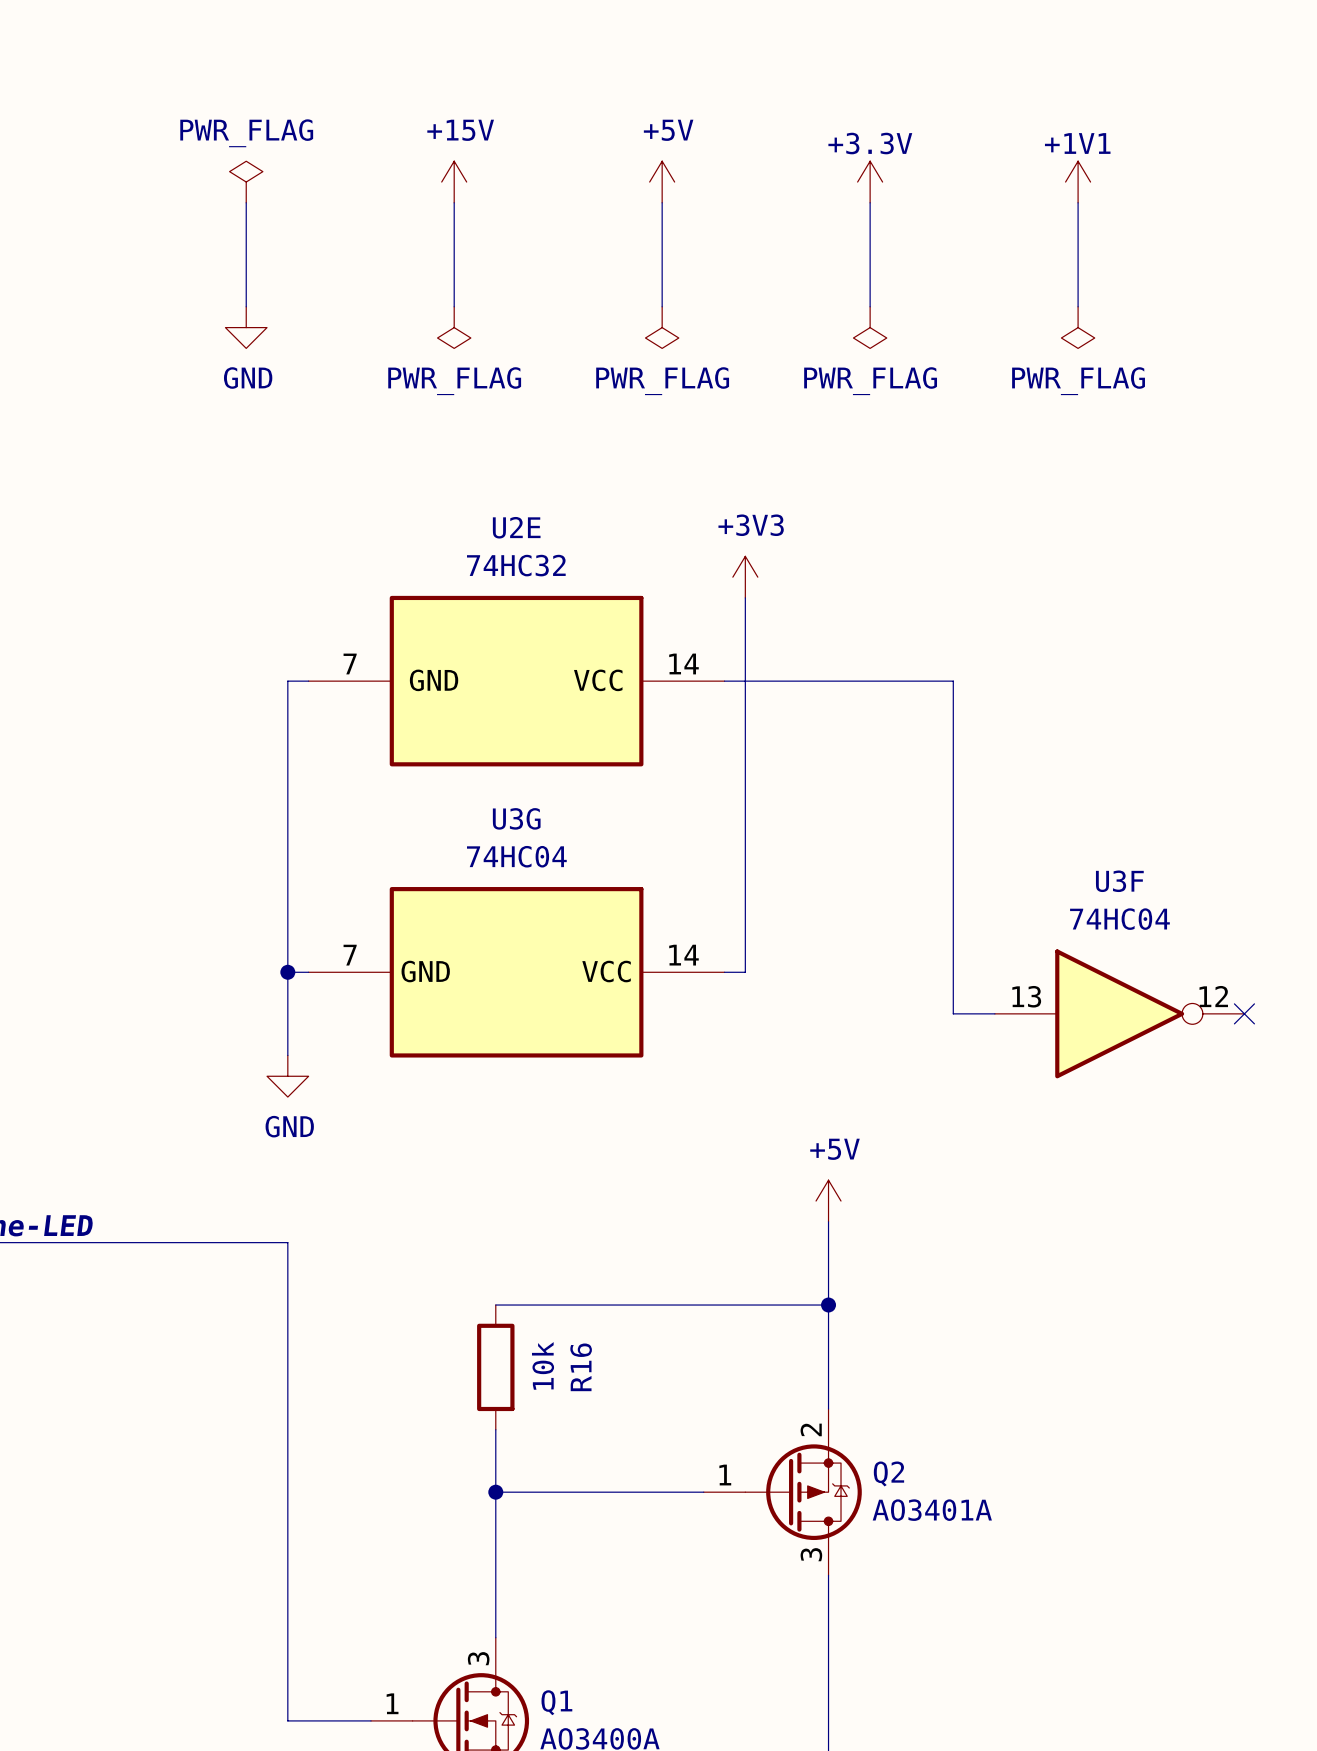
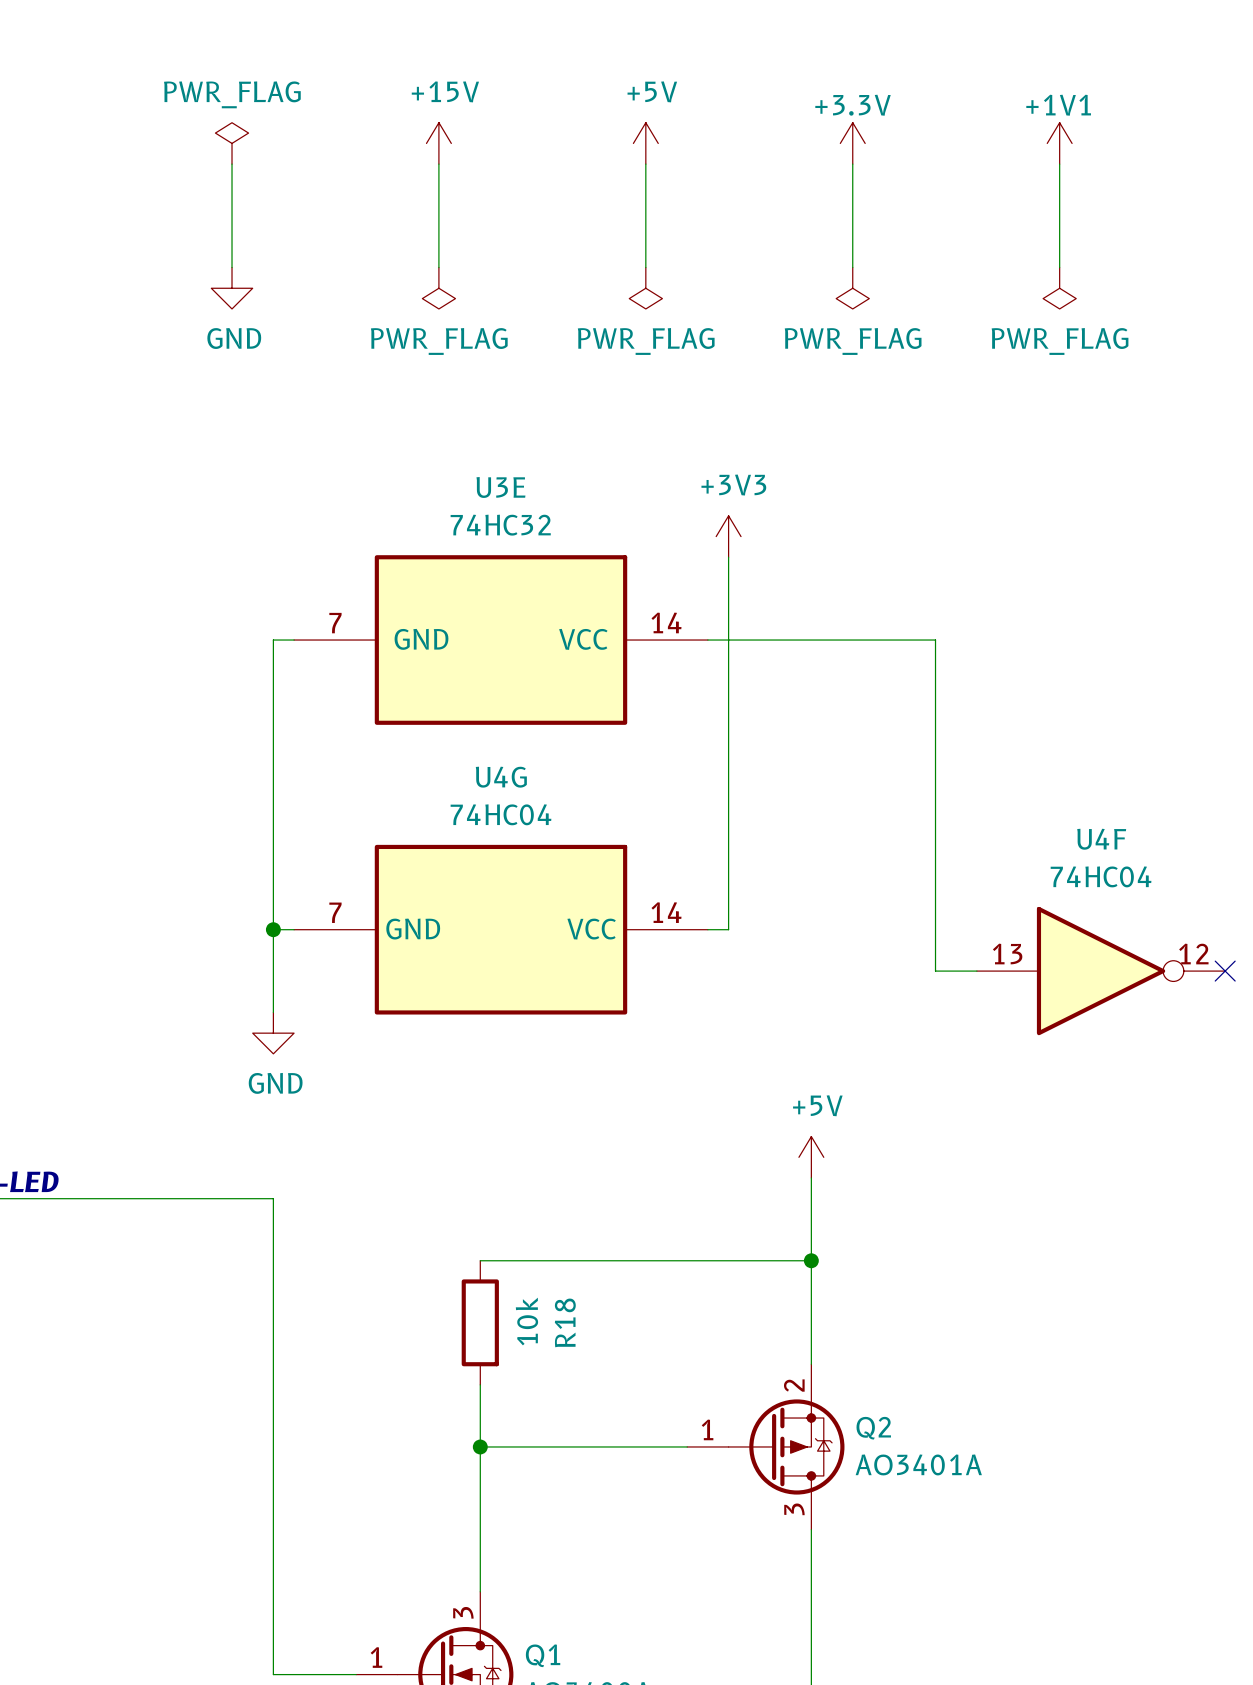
U2E name: U2E (516, 527) -> U3E (500, 487)
U3G name: U3G (516, 818) -> U4G (501, 777)
U3F name: U3F (1119, 881) -> U4F (1101, 839)
R16 name: R16 (581, 1367) -> R18 (565, 1322)

